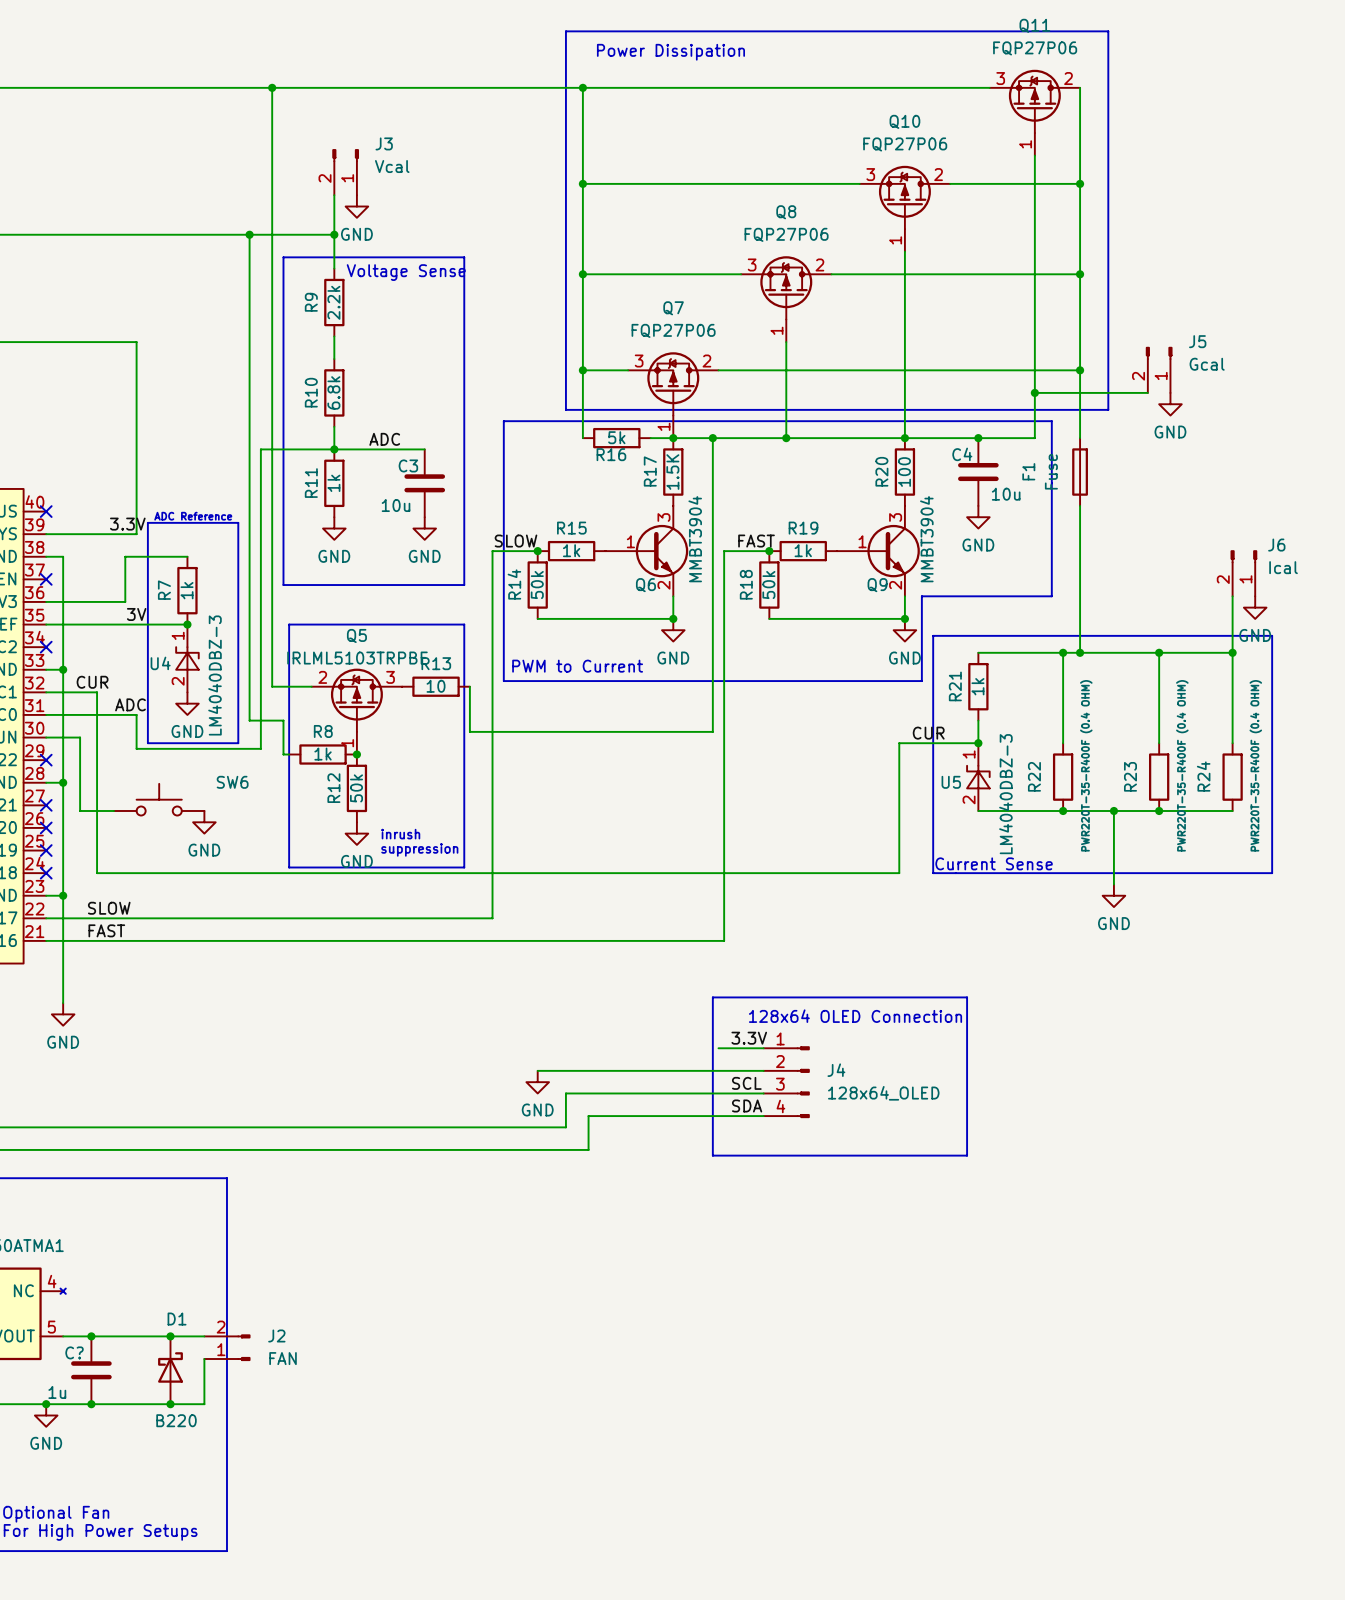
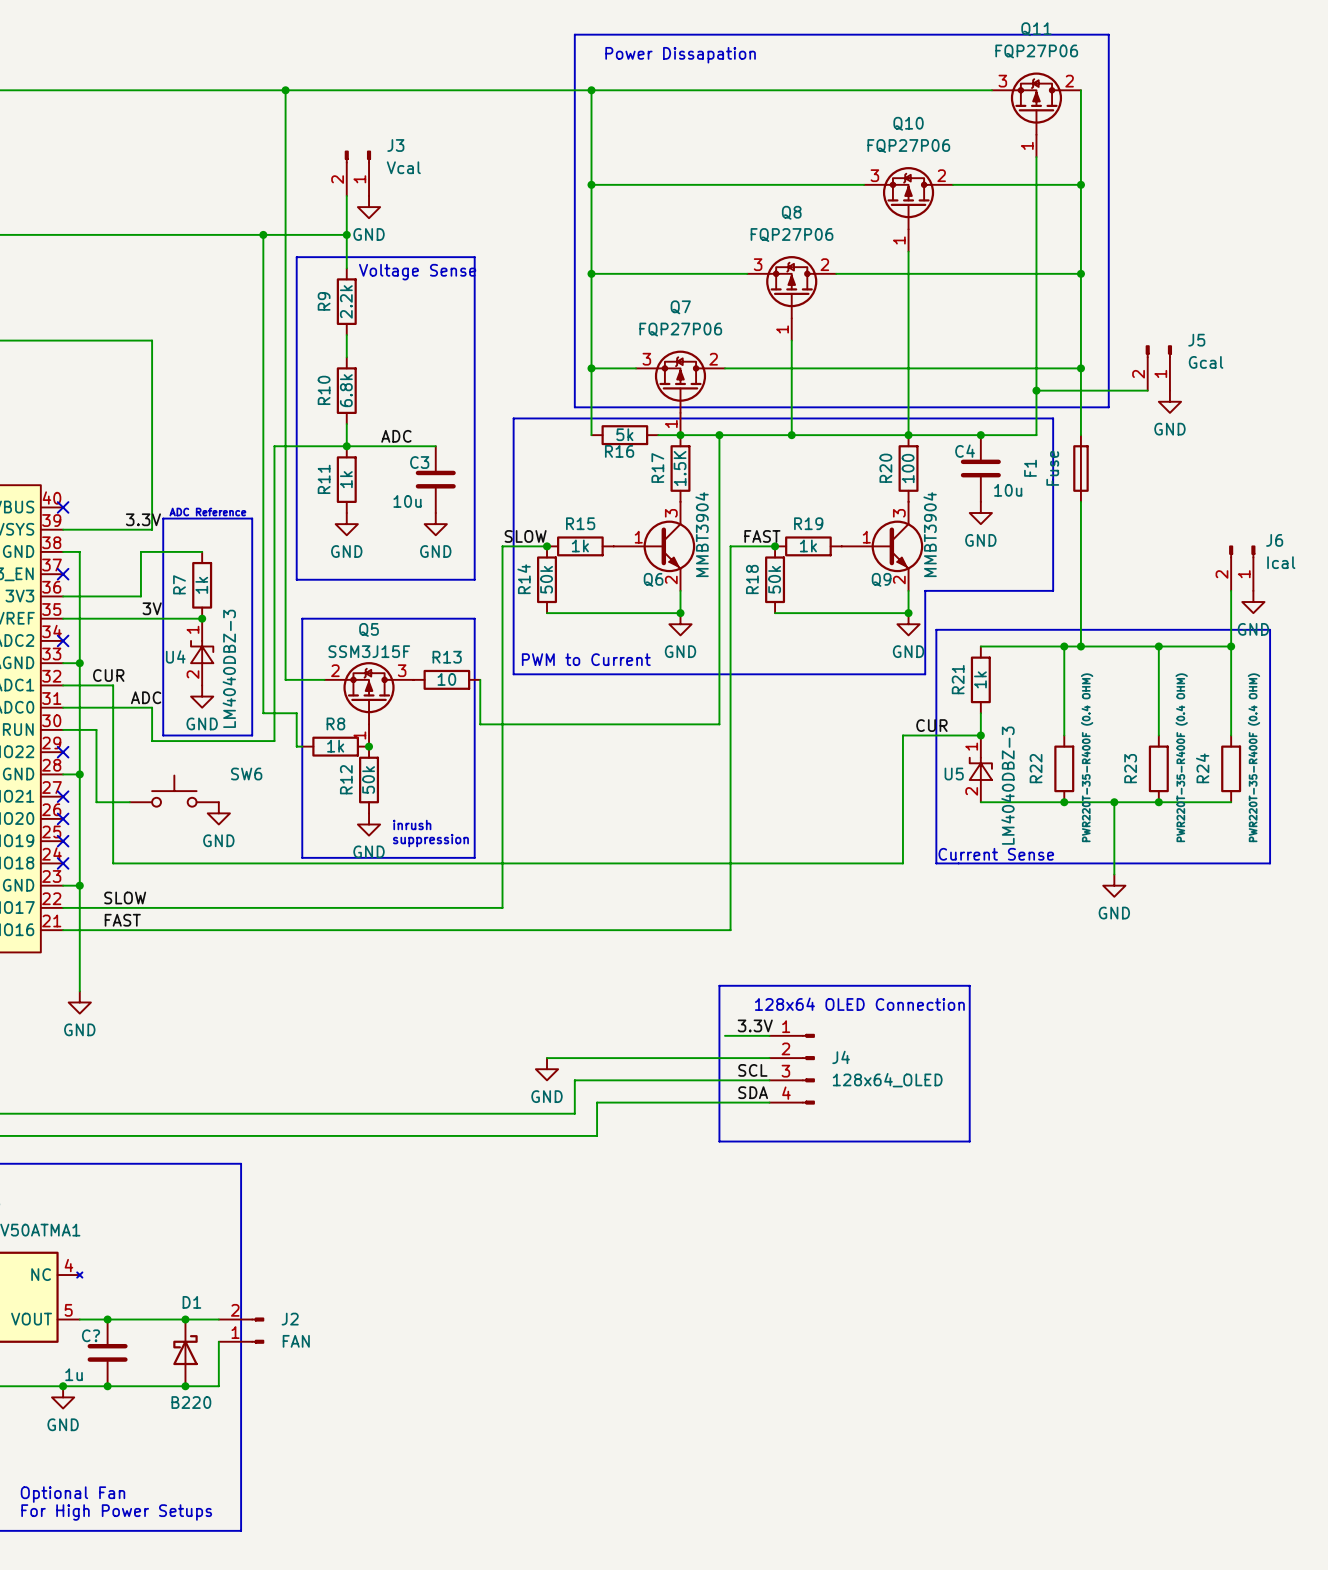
text: Power Dissipation (670, 52) -> Power Dissapation (680, 55)
Q5 value: IRLML5103TRPBF (357, 658) -> SSM3J15F (369, 651)

